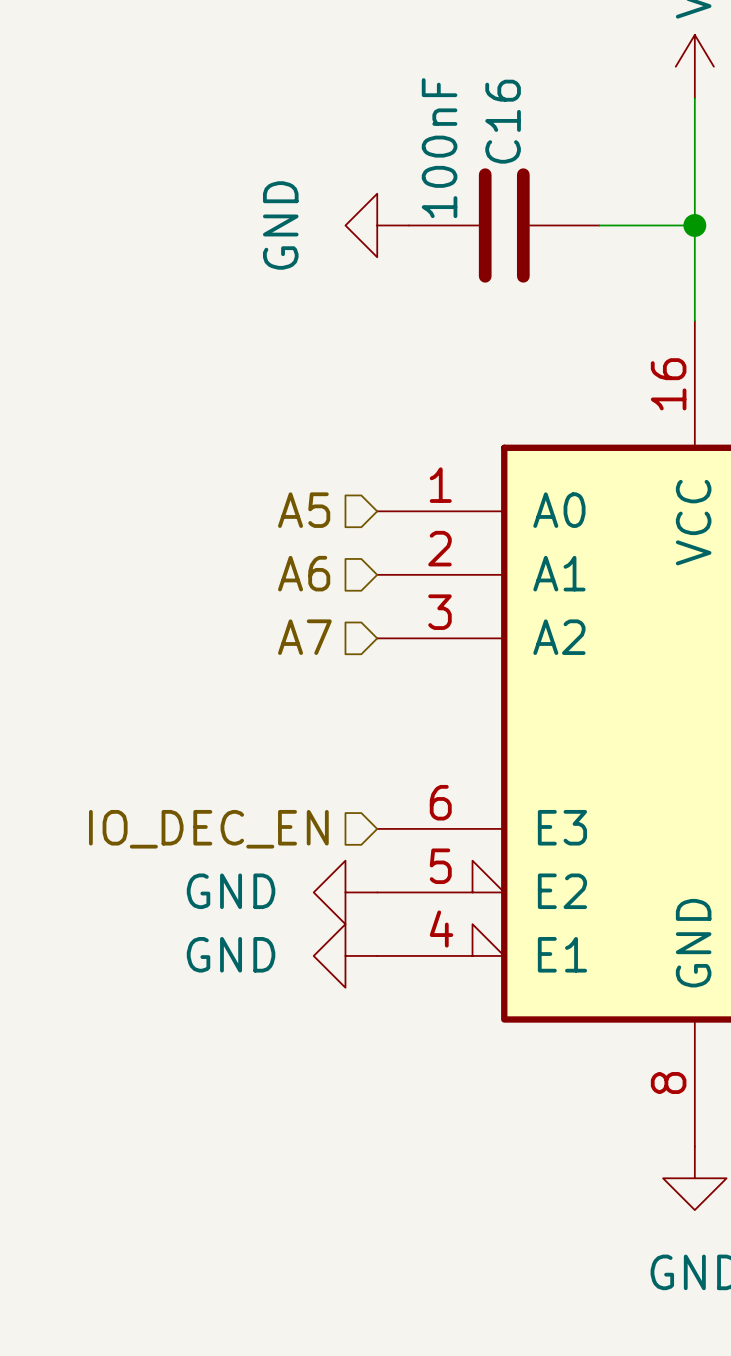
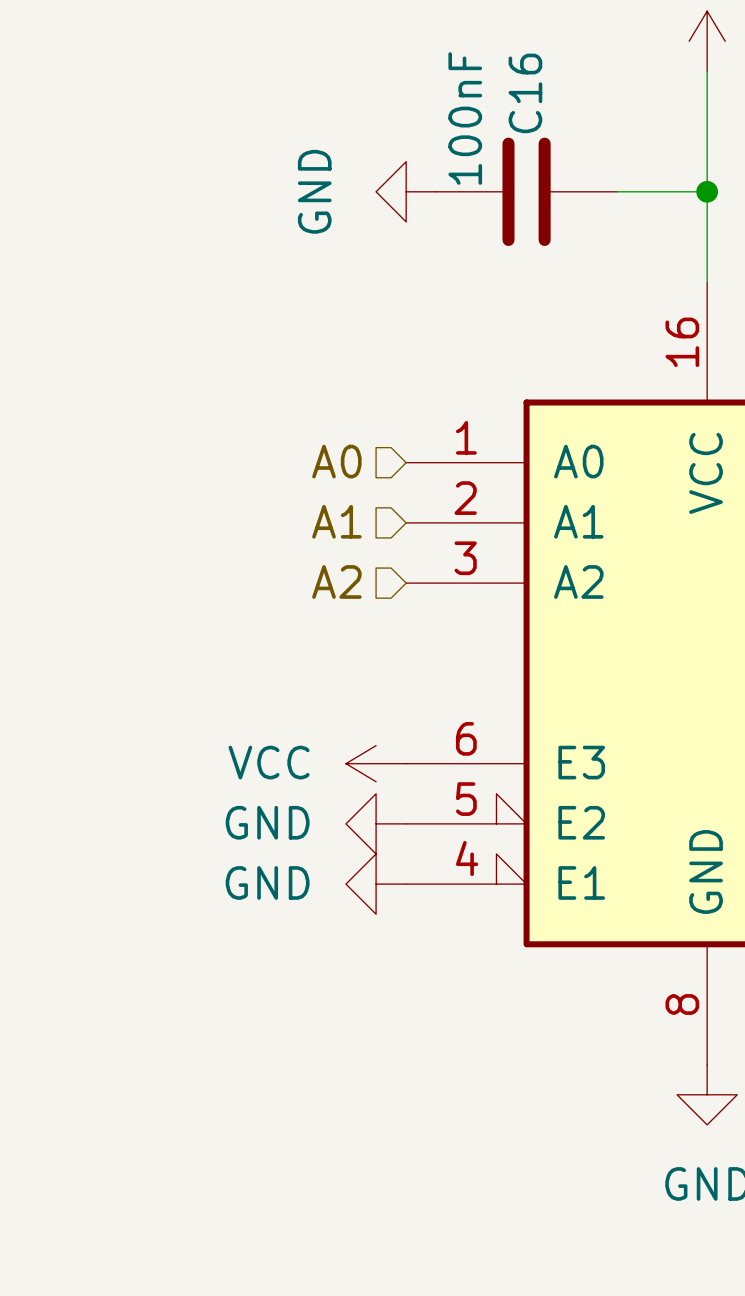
hierarchical label: A5 (304, 510) -> A0 (336, 461)
hierarchical label: A6 (304, 573) -> A1 (336, 521)
hierarchical label: A7 (304, 637) -> A2 (336, 581)
power symbol: none -> VCC (376, 763)
hierarchical label: IO_DEC_EN (208, 829) -> none

